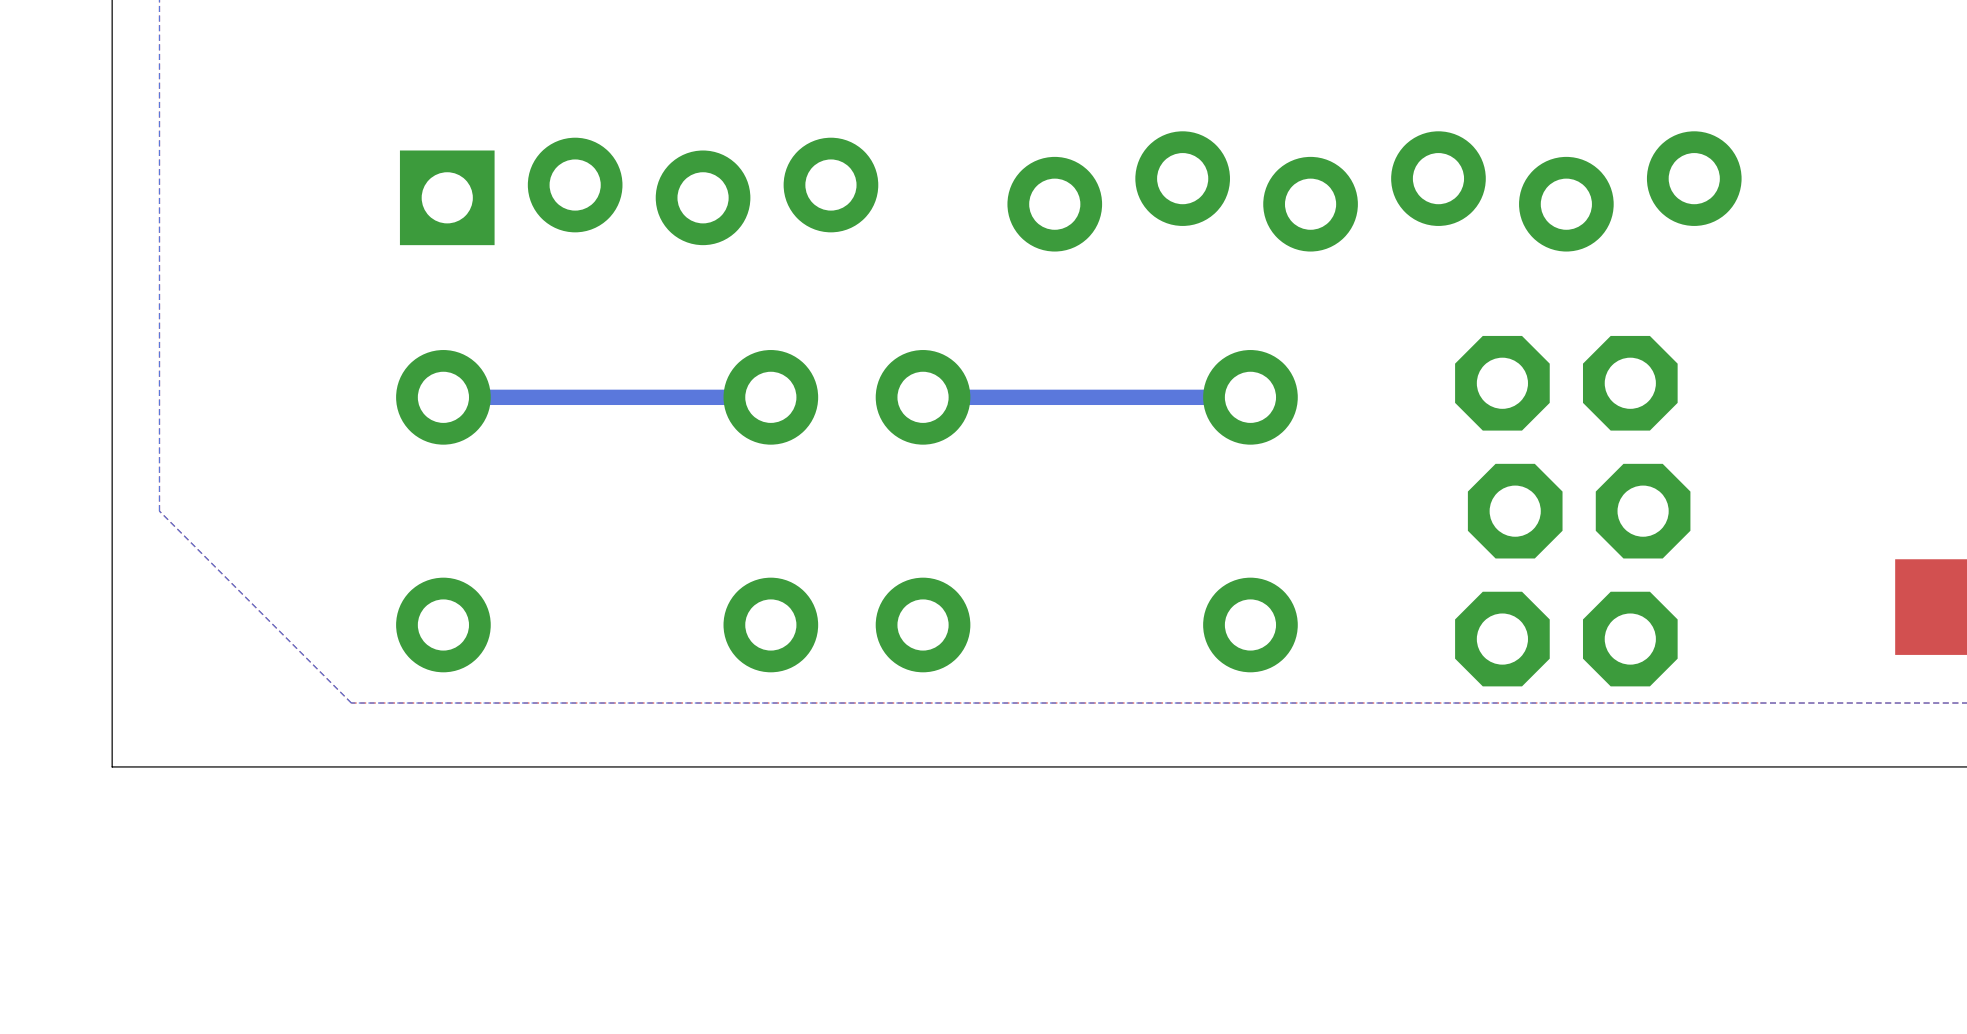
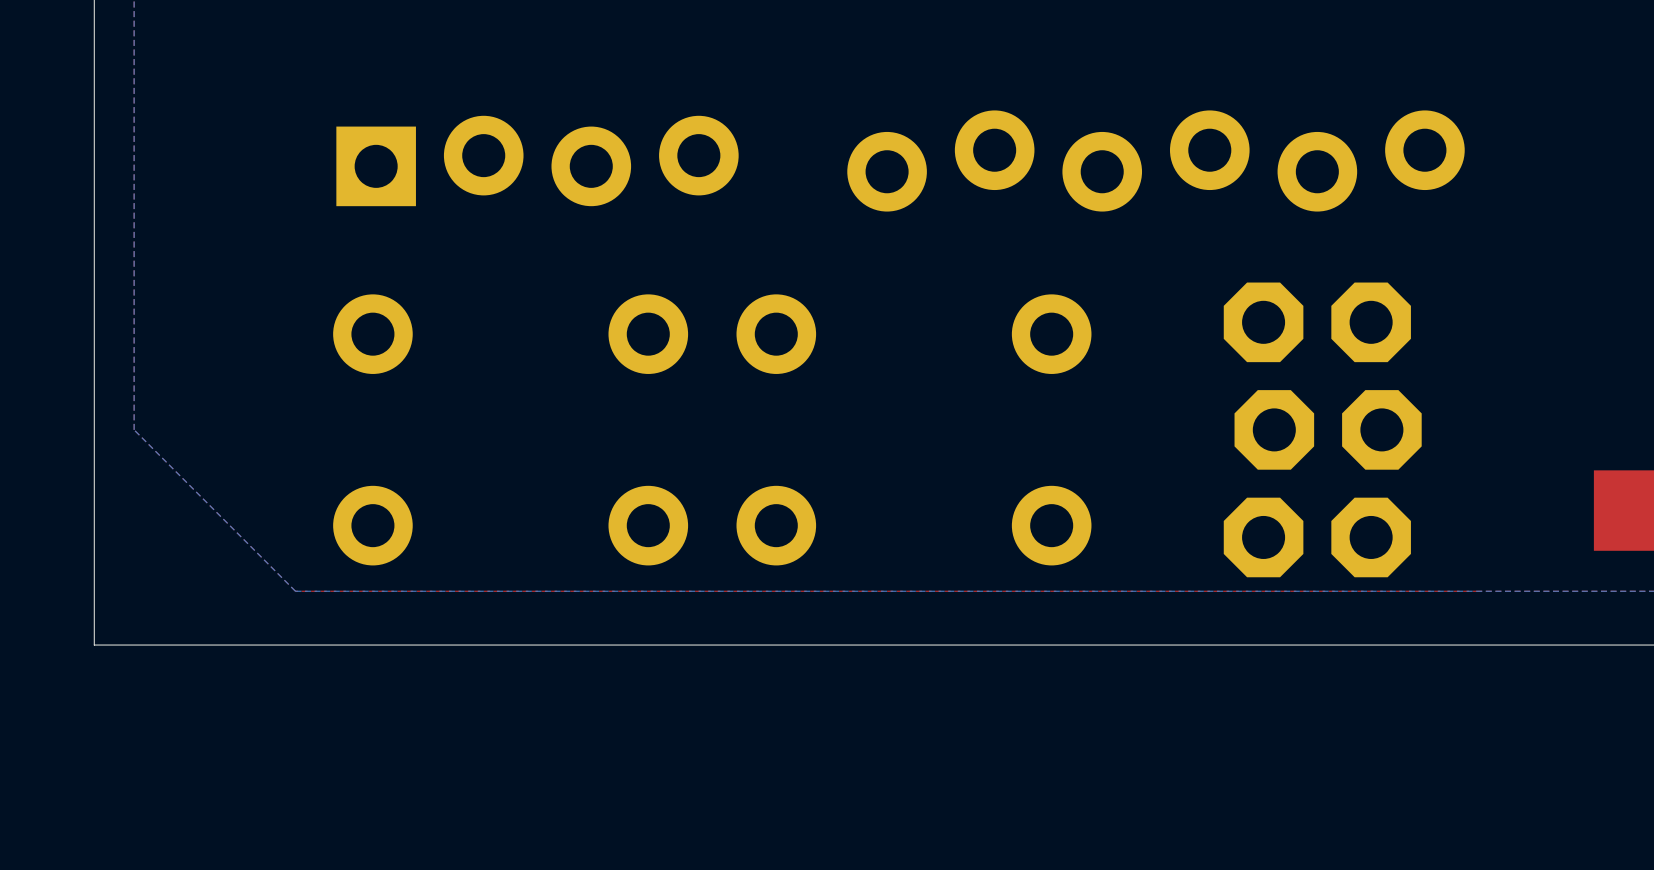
bottom track: (770, 397) (443, 397) -> none
bottom track: (1250, 397) (923, 397) -> none

